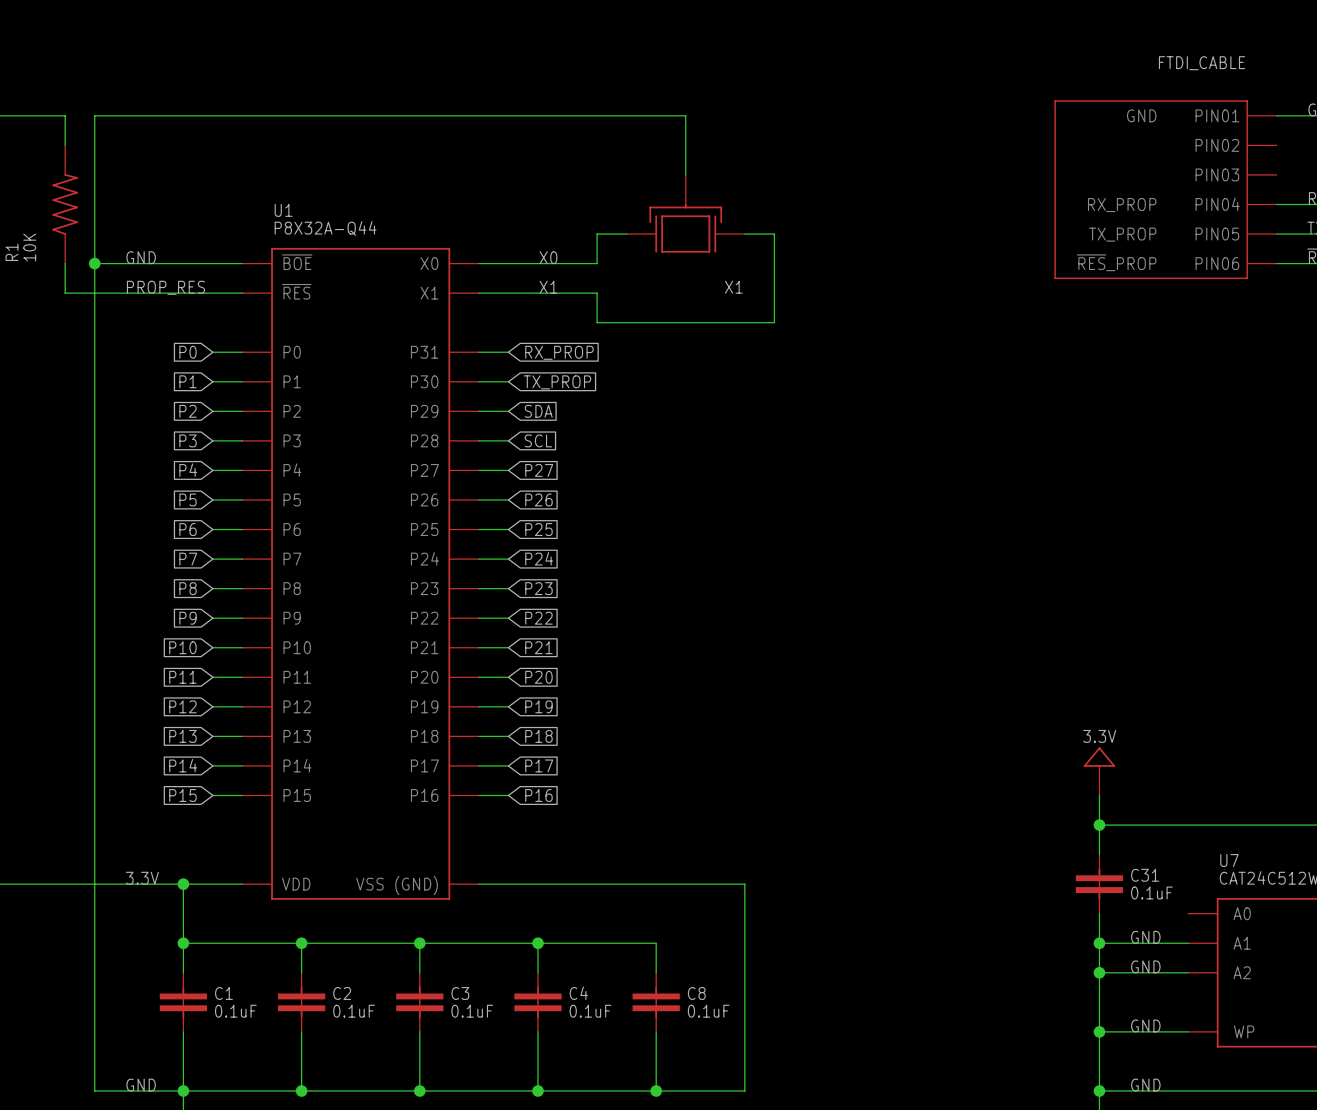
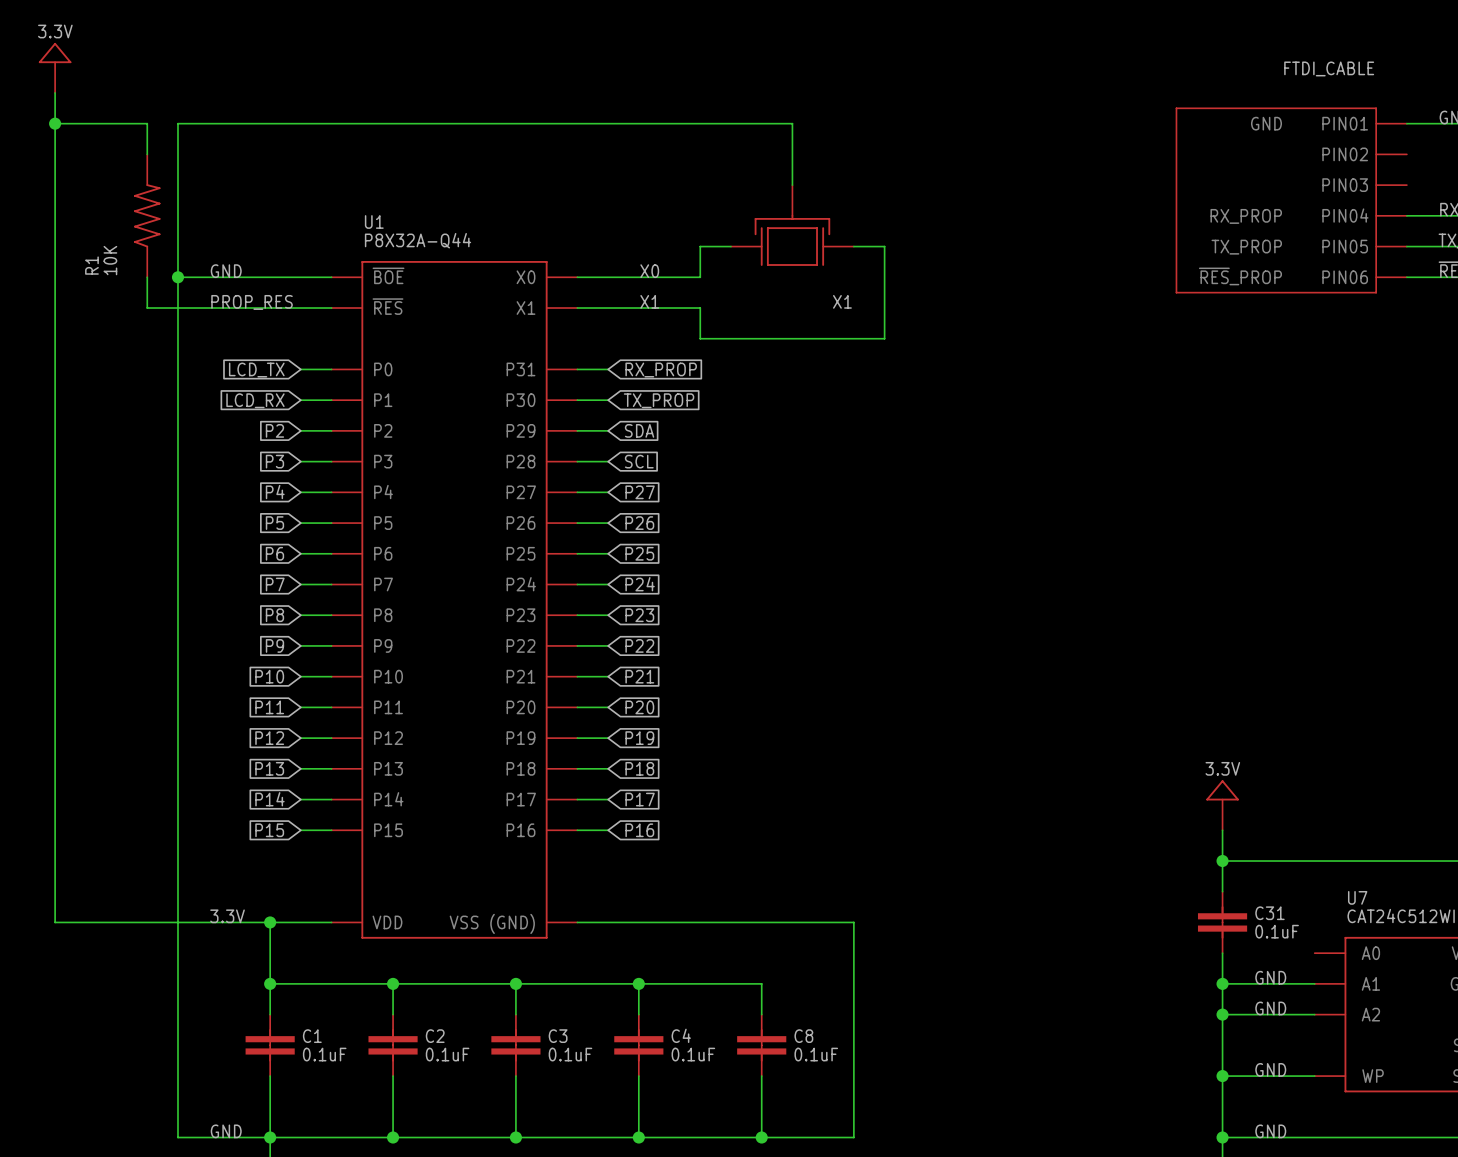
global label: P0 (188, 352) -> LCD_TX (256, 370)
global label: P1 (188, 381) -> LCD_RX (255, 400)

